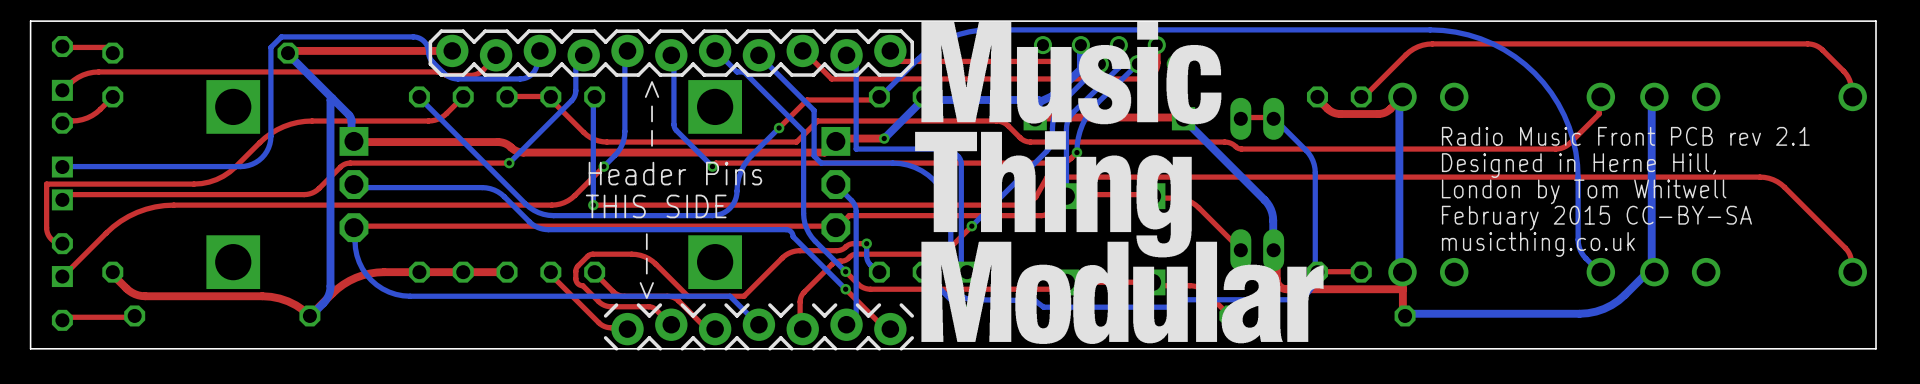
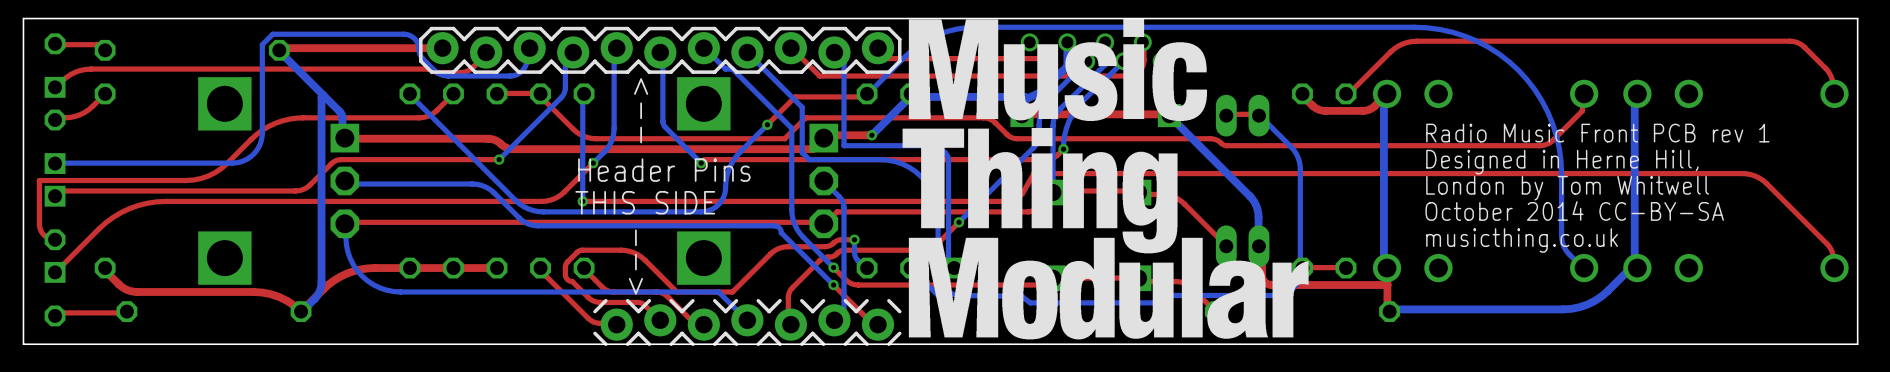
text: Radio Music Front PCB rev 2.1 (1625, 136) -> Radio Music Front PCB rev 1 (1597, 133)
text: February 2015 CC-BY-SA (1596, 218) -> October 2014 CC-BY-SA (1574, 211)

